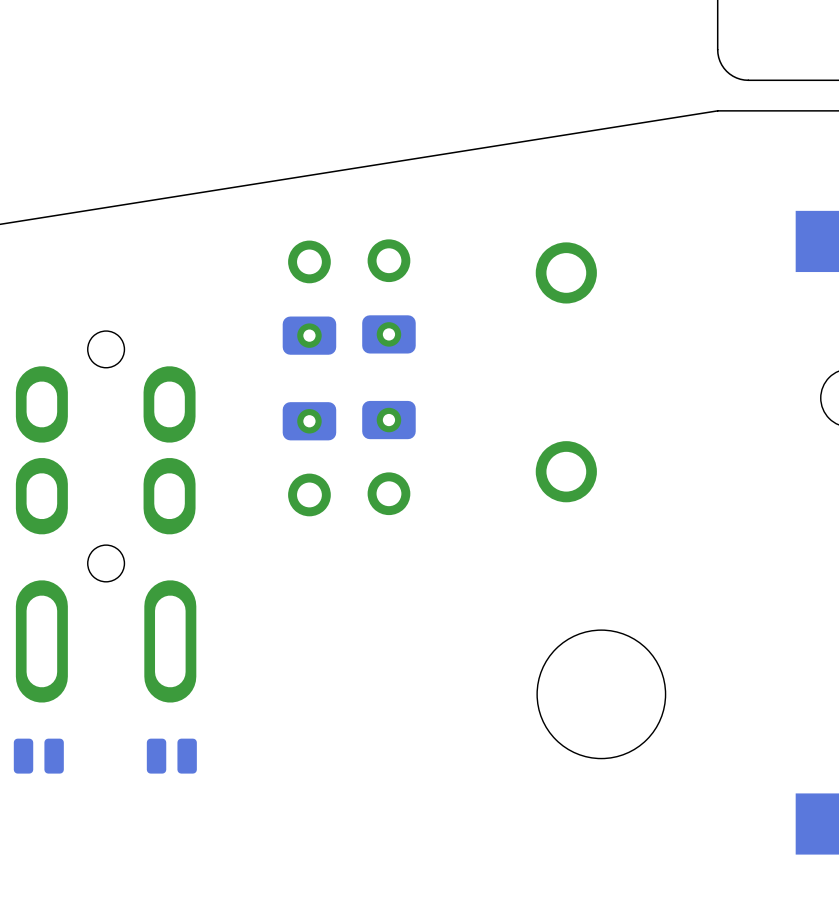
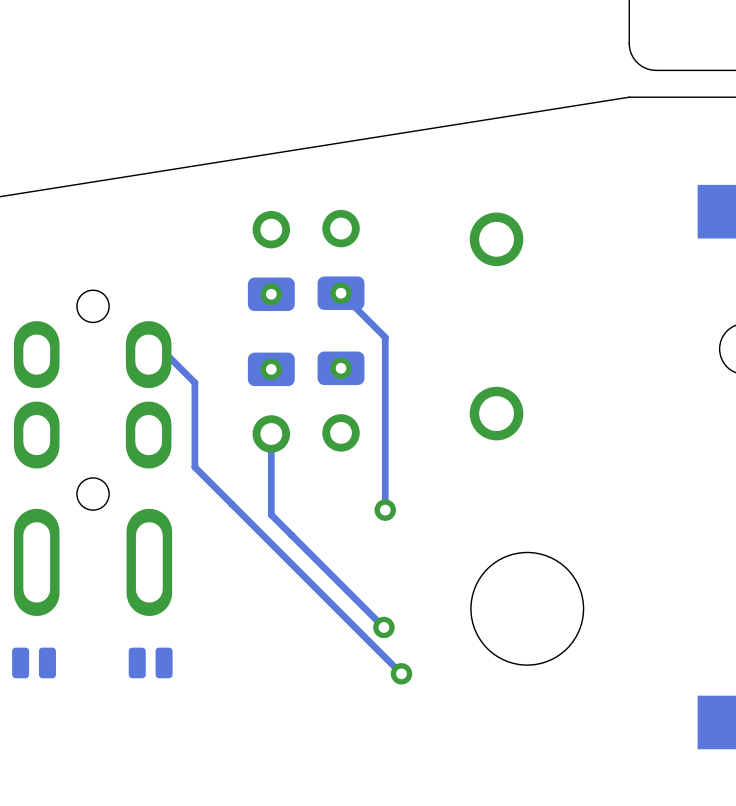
track: none -> (341, 293) (385, 337) (385, 510)
track: none -> (148, 354) (166, 354) (194, 382) (194, 467) (401, 673)
track: none -> (271, 433) (271, 514) (383, 627)
via: none -> (385, 510)
via: none -> (383, 627)
via: none -> (401, 673)

